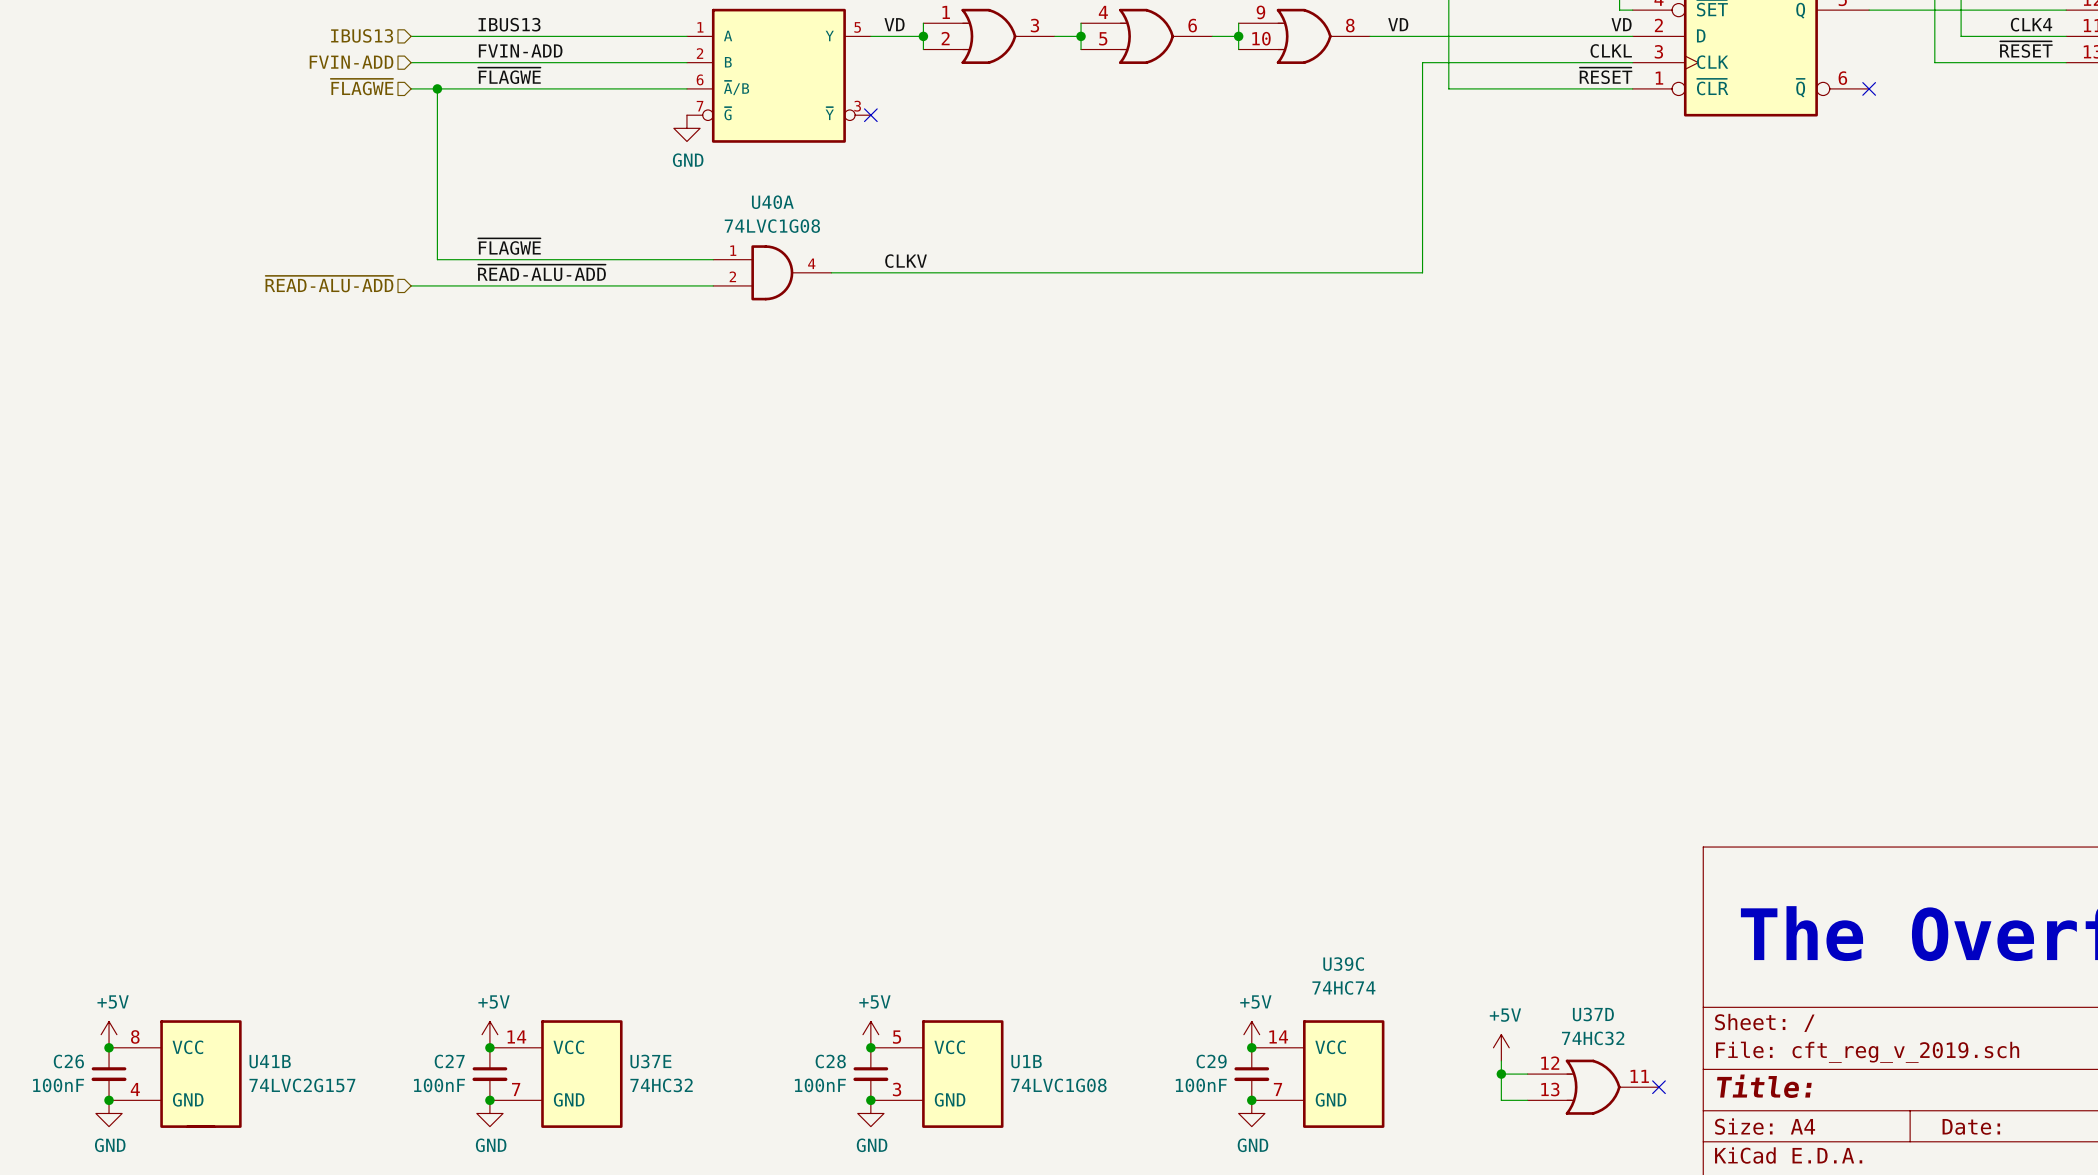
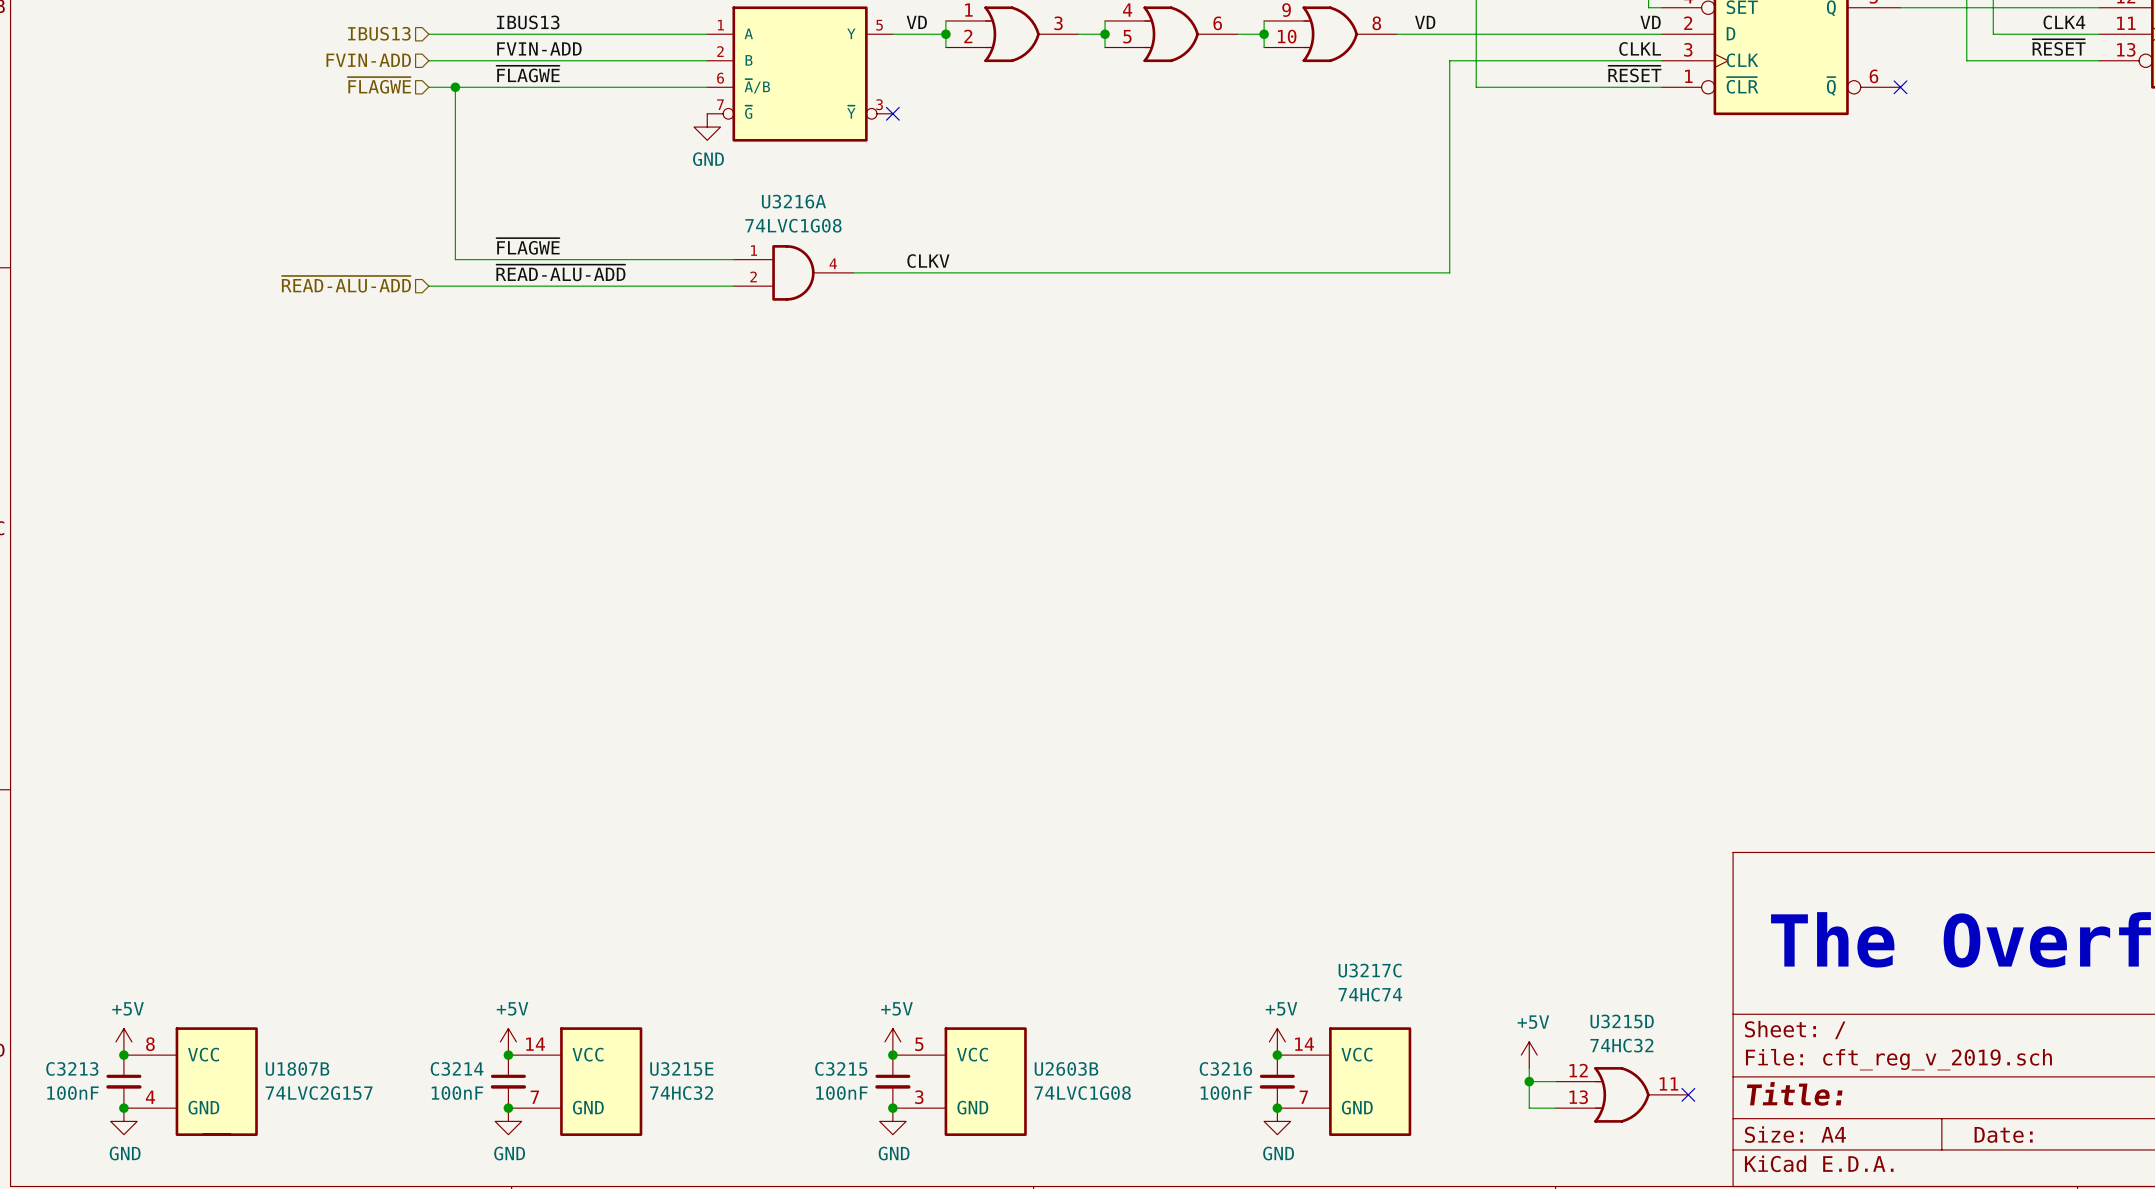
U40A name: U40A (772, 202) -> U3216A (793, 201)
U39C name: U39C (1343, 964) -> U3217C (1370, 970)
U37D name: U37D (1593, 1014) -> U3215D (1622, 1021)
C26 name: C26 (68, 1061) -> C3213 (72, 1068)
U41B name: U41B (270, 1061) -> U1807B (297, 1068)
C27 name: C27 (449, 1061) -> C3214 (457, 1068)
U37E name: U37E (650, 1061) -> U3215E (681, 1068)
C28 name: C28 (830, 1061) -> C3215 (841, 1068)
U1B name: U1B (1026, 1061) -> U2603B (1066, 1068)
C29 name: C29 (1211, 1061) -> C3216 (1225, 1068)

